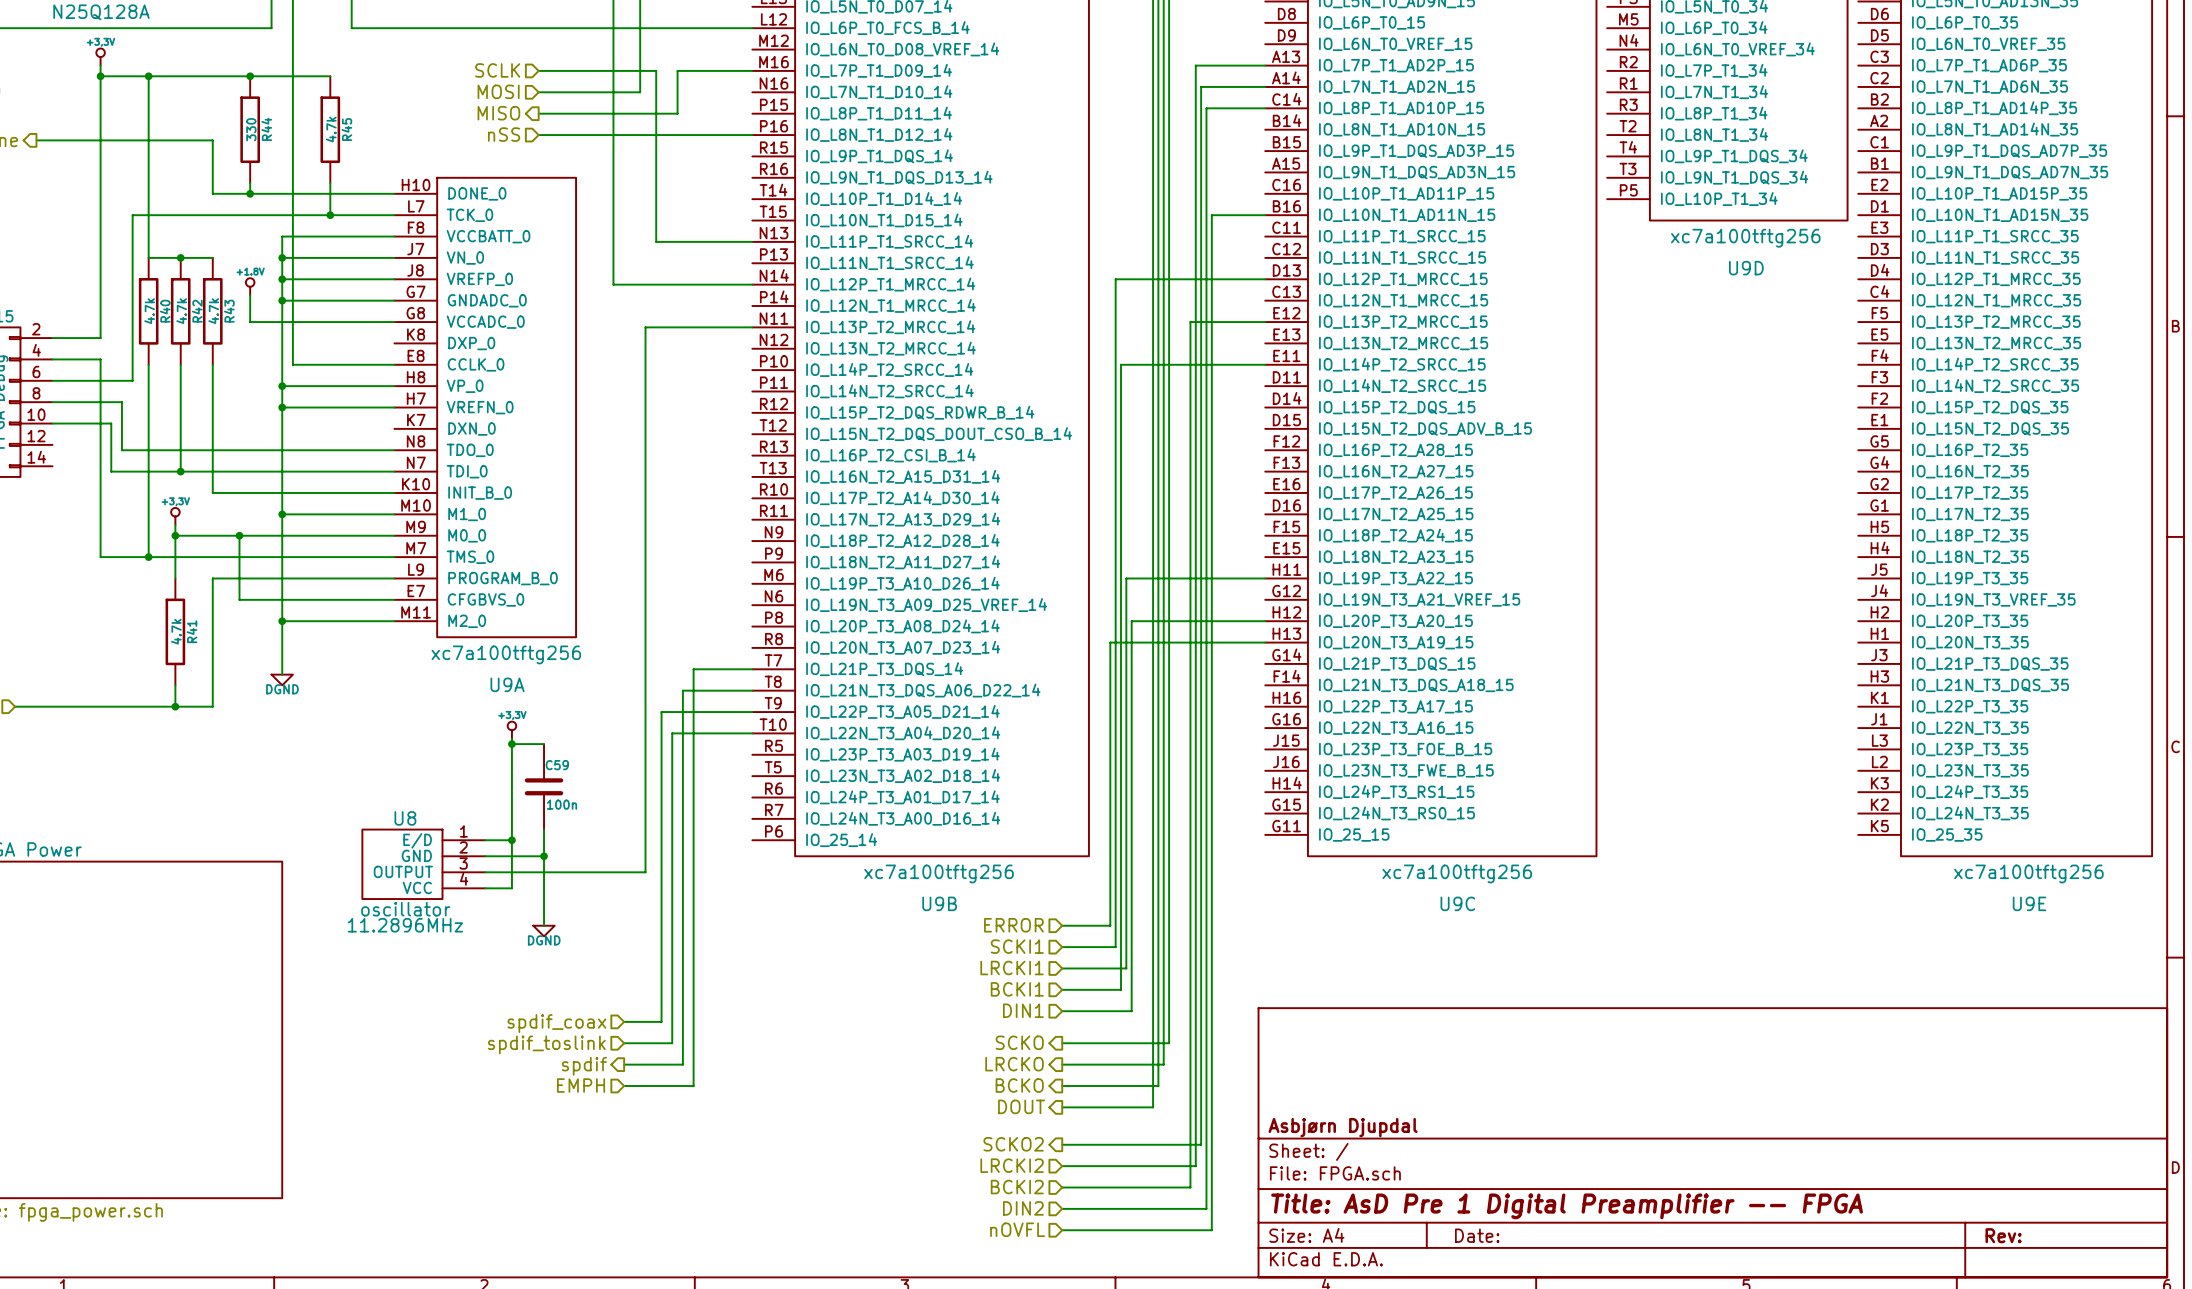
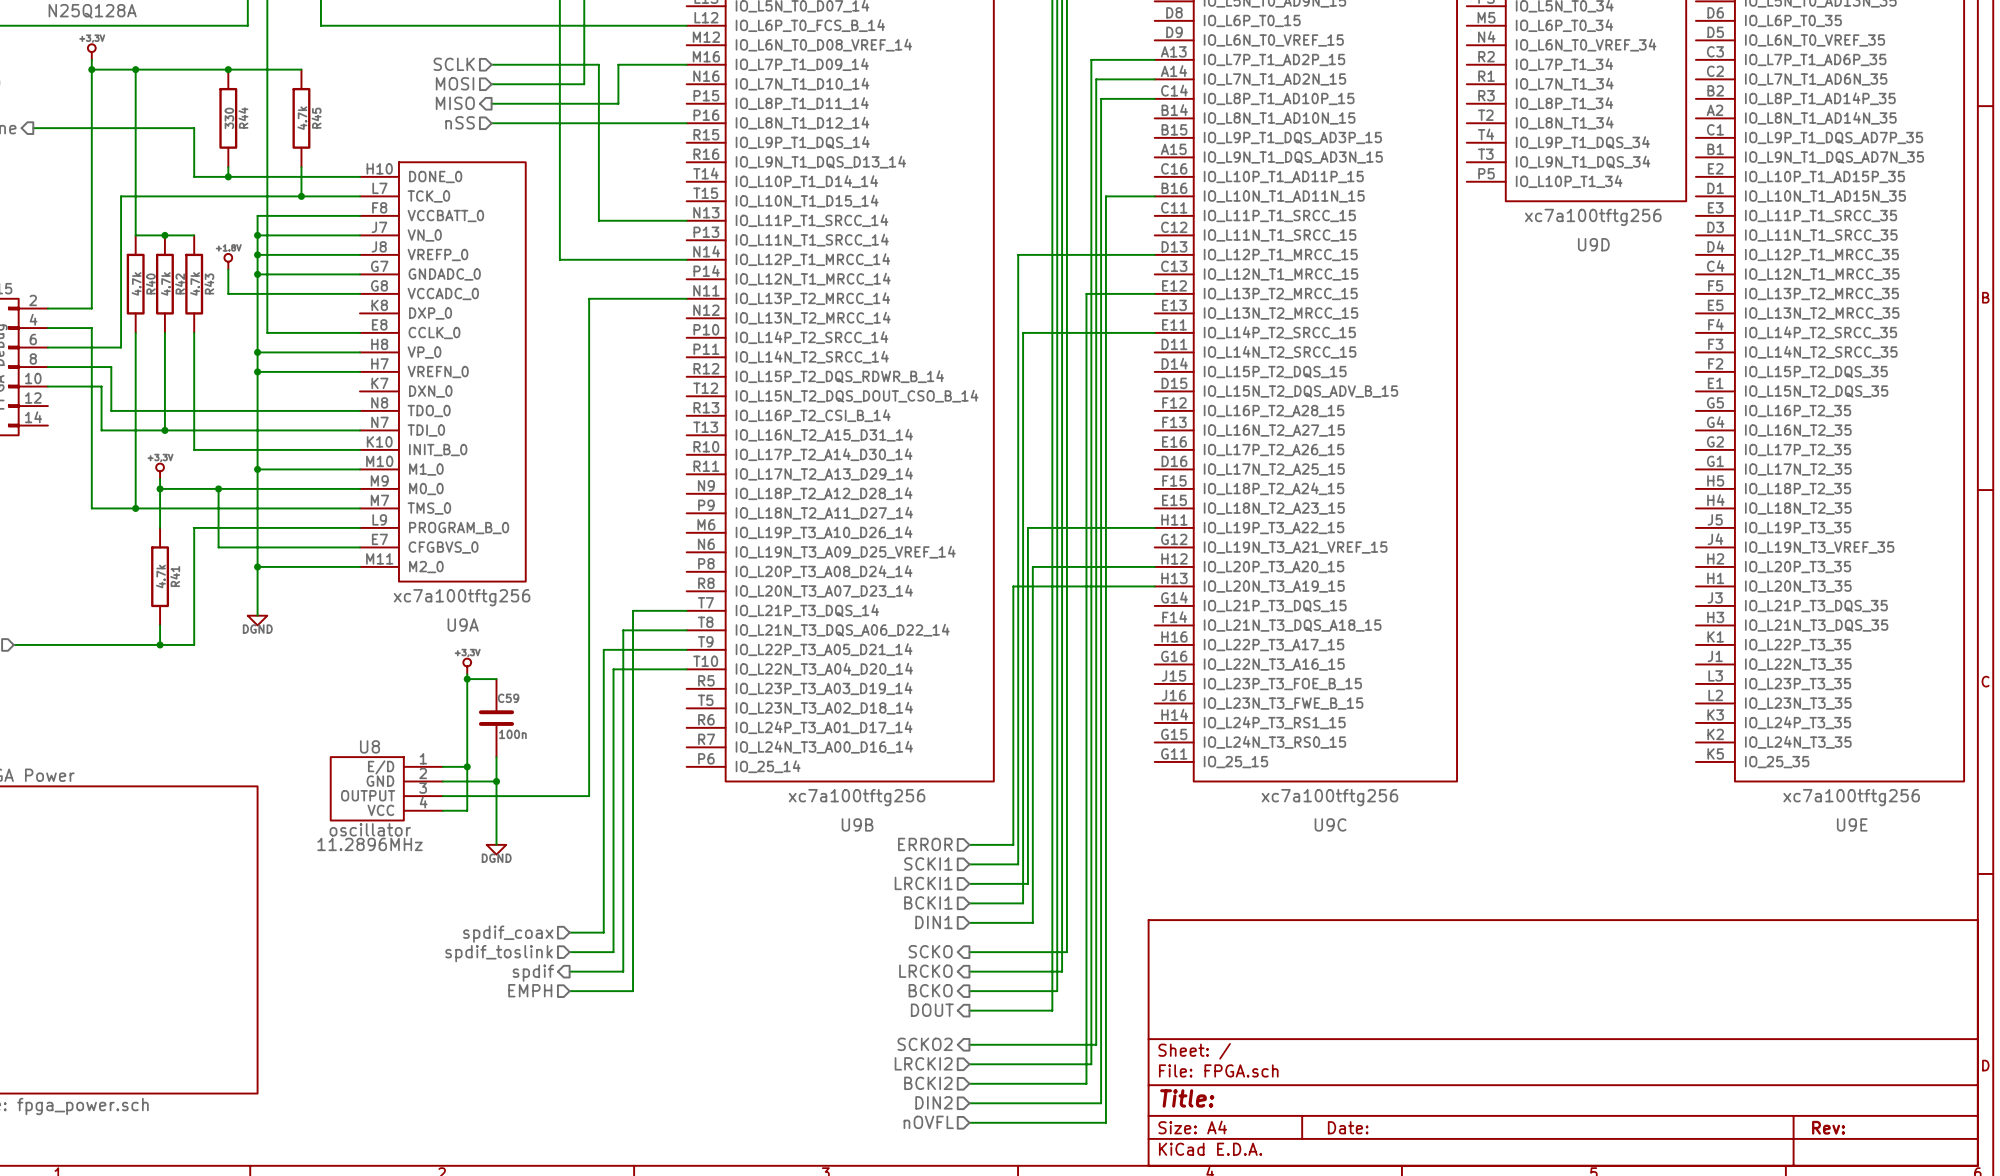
title block: Asbjørn Djupdal (1343, 1127) -> none
title block: Title: AsD Pre 1 Digital Preamplifier -- FPGA (1567, 1206) -> Title: (1187, 1098)

